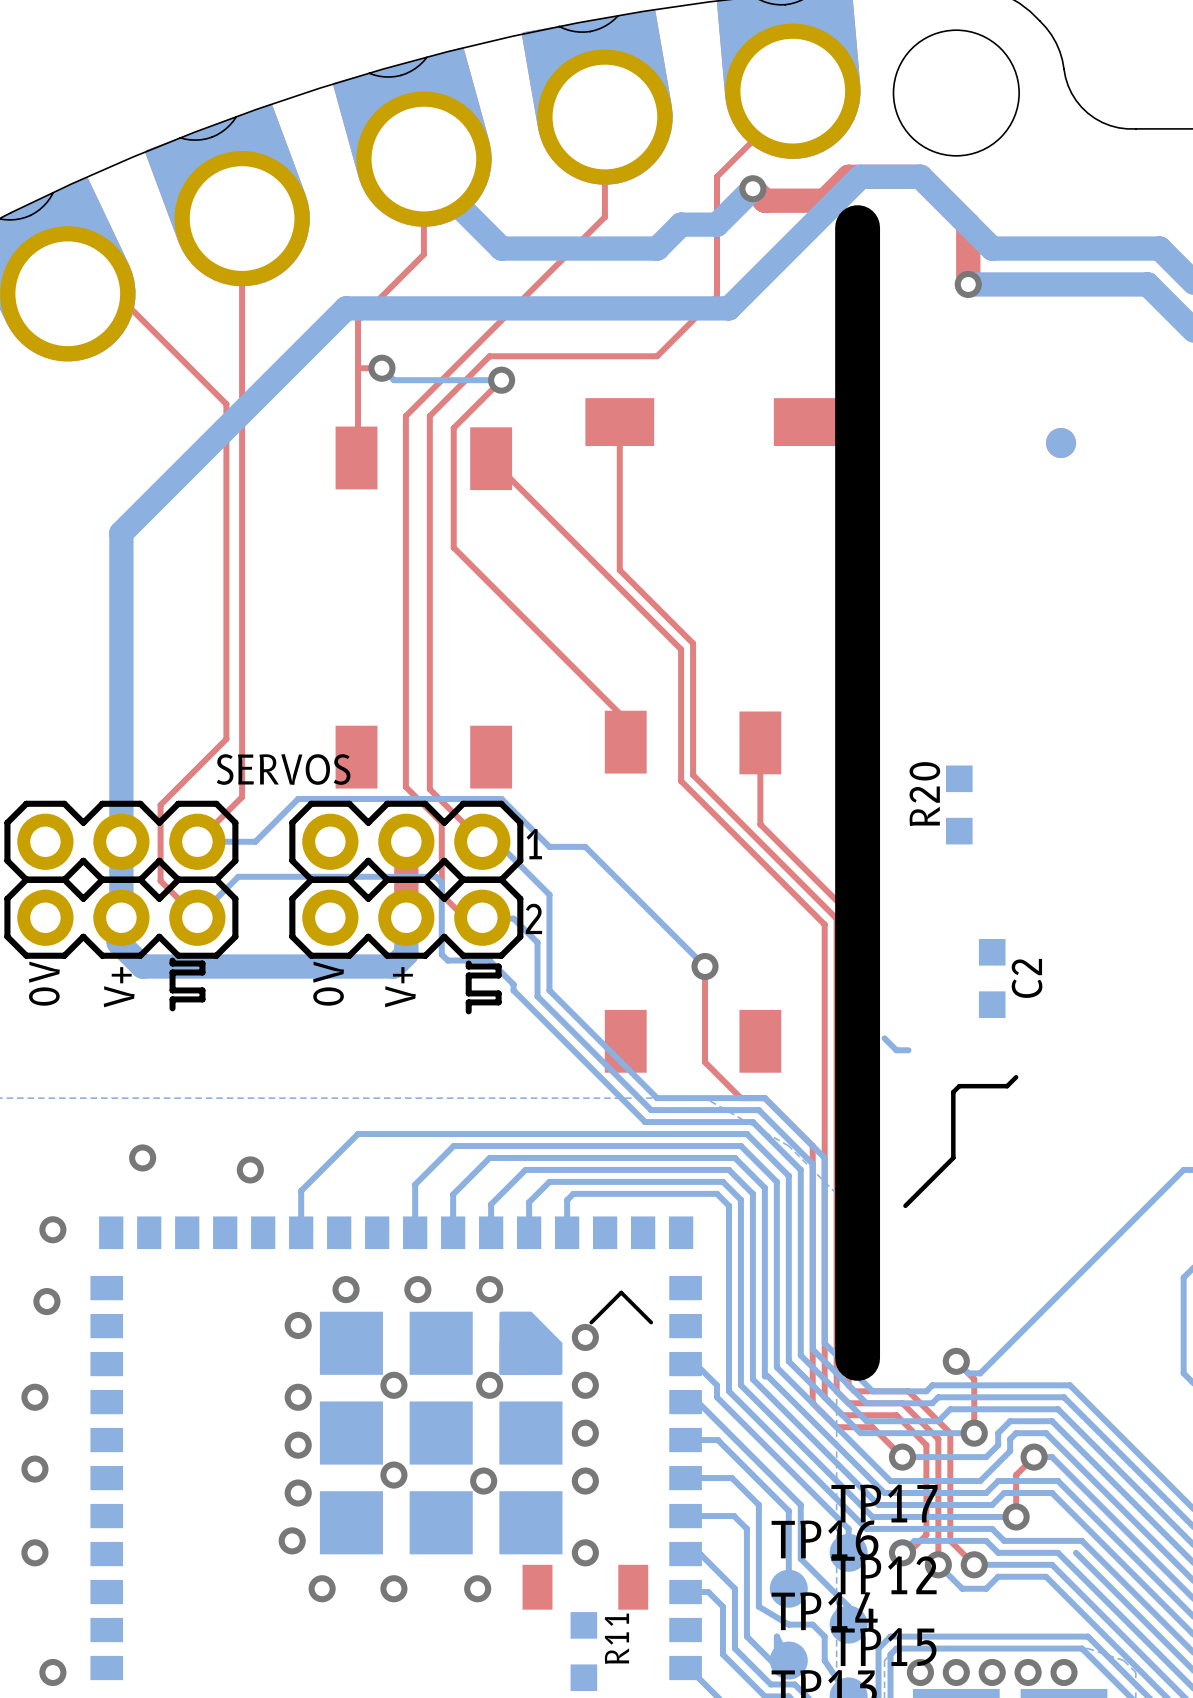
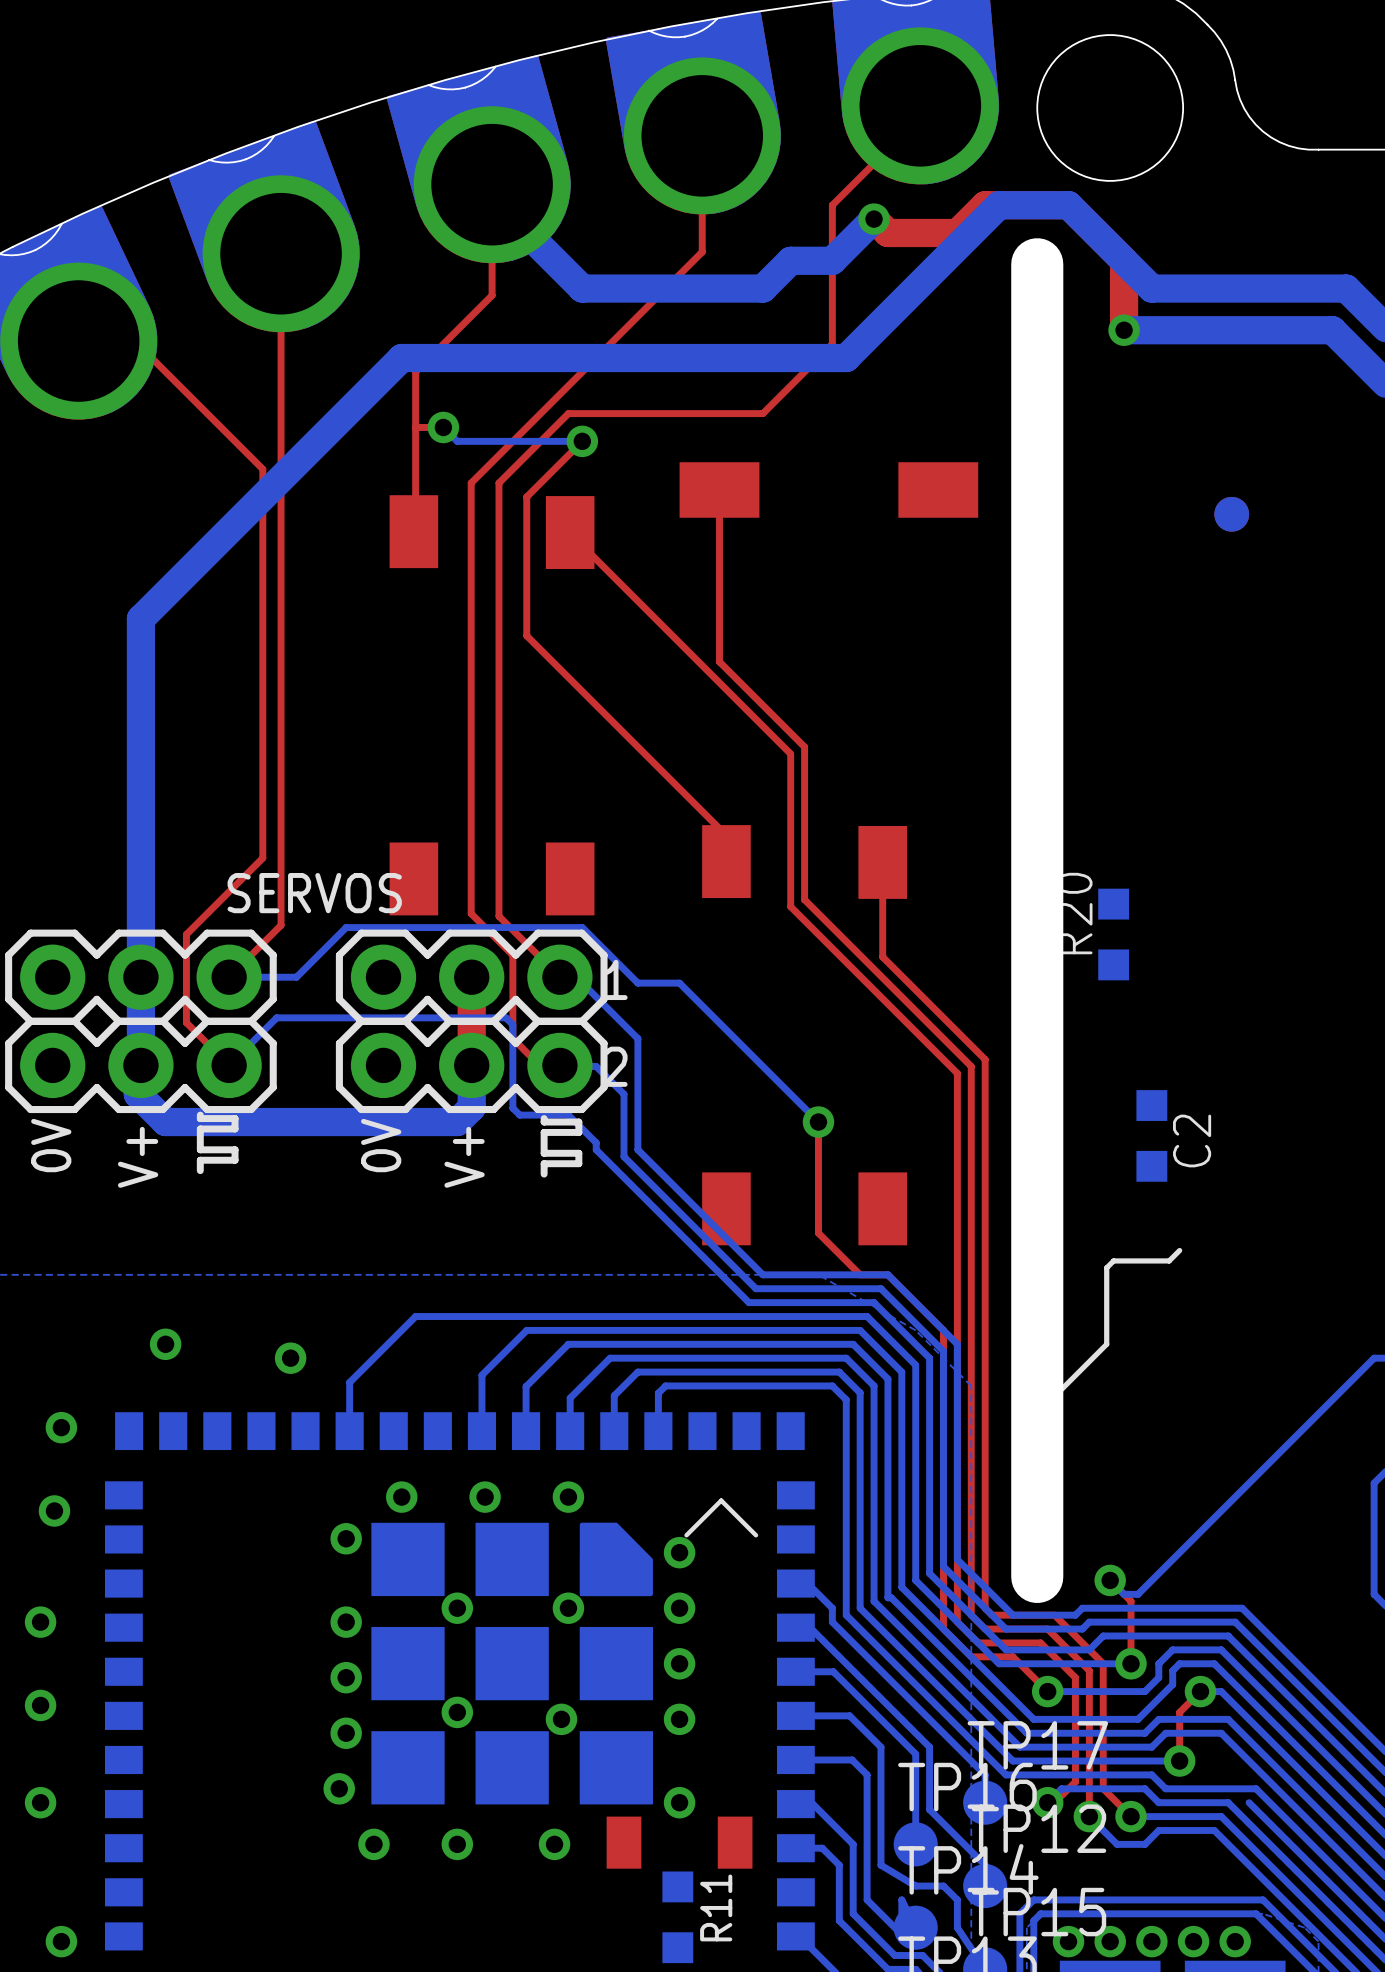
drawing position: (857, 793) -> (1037, 920)

